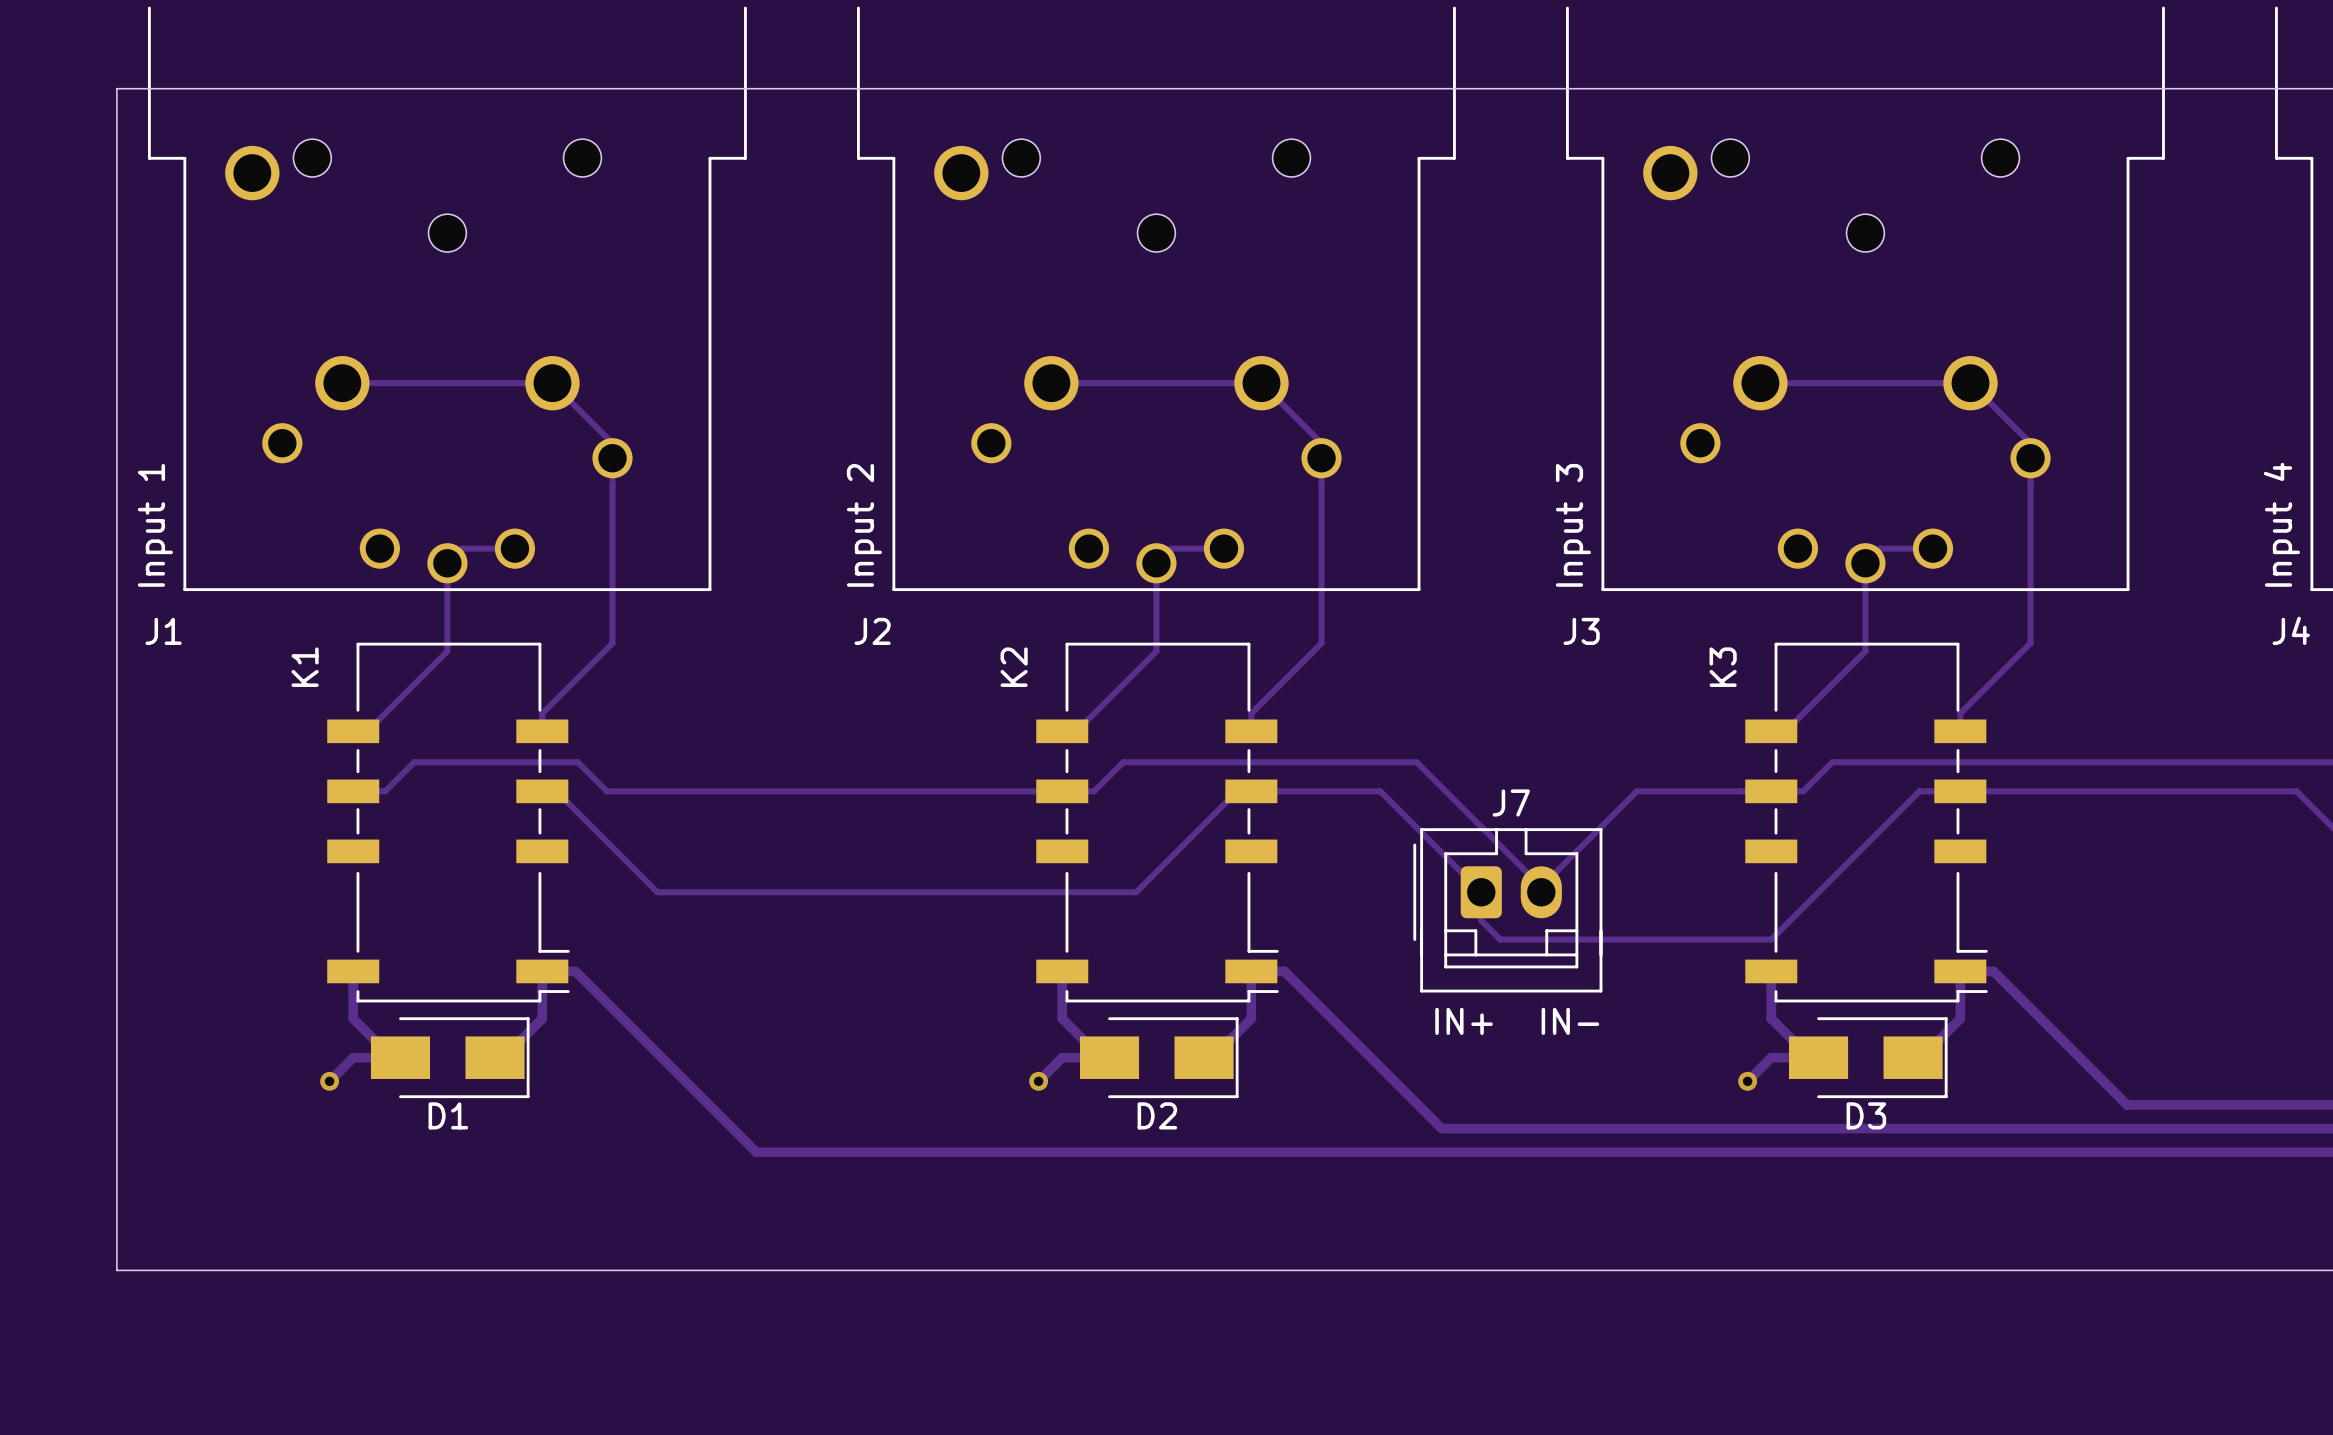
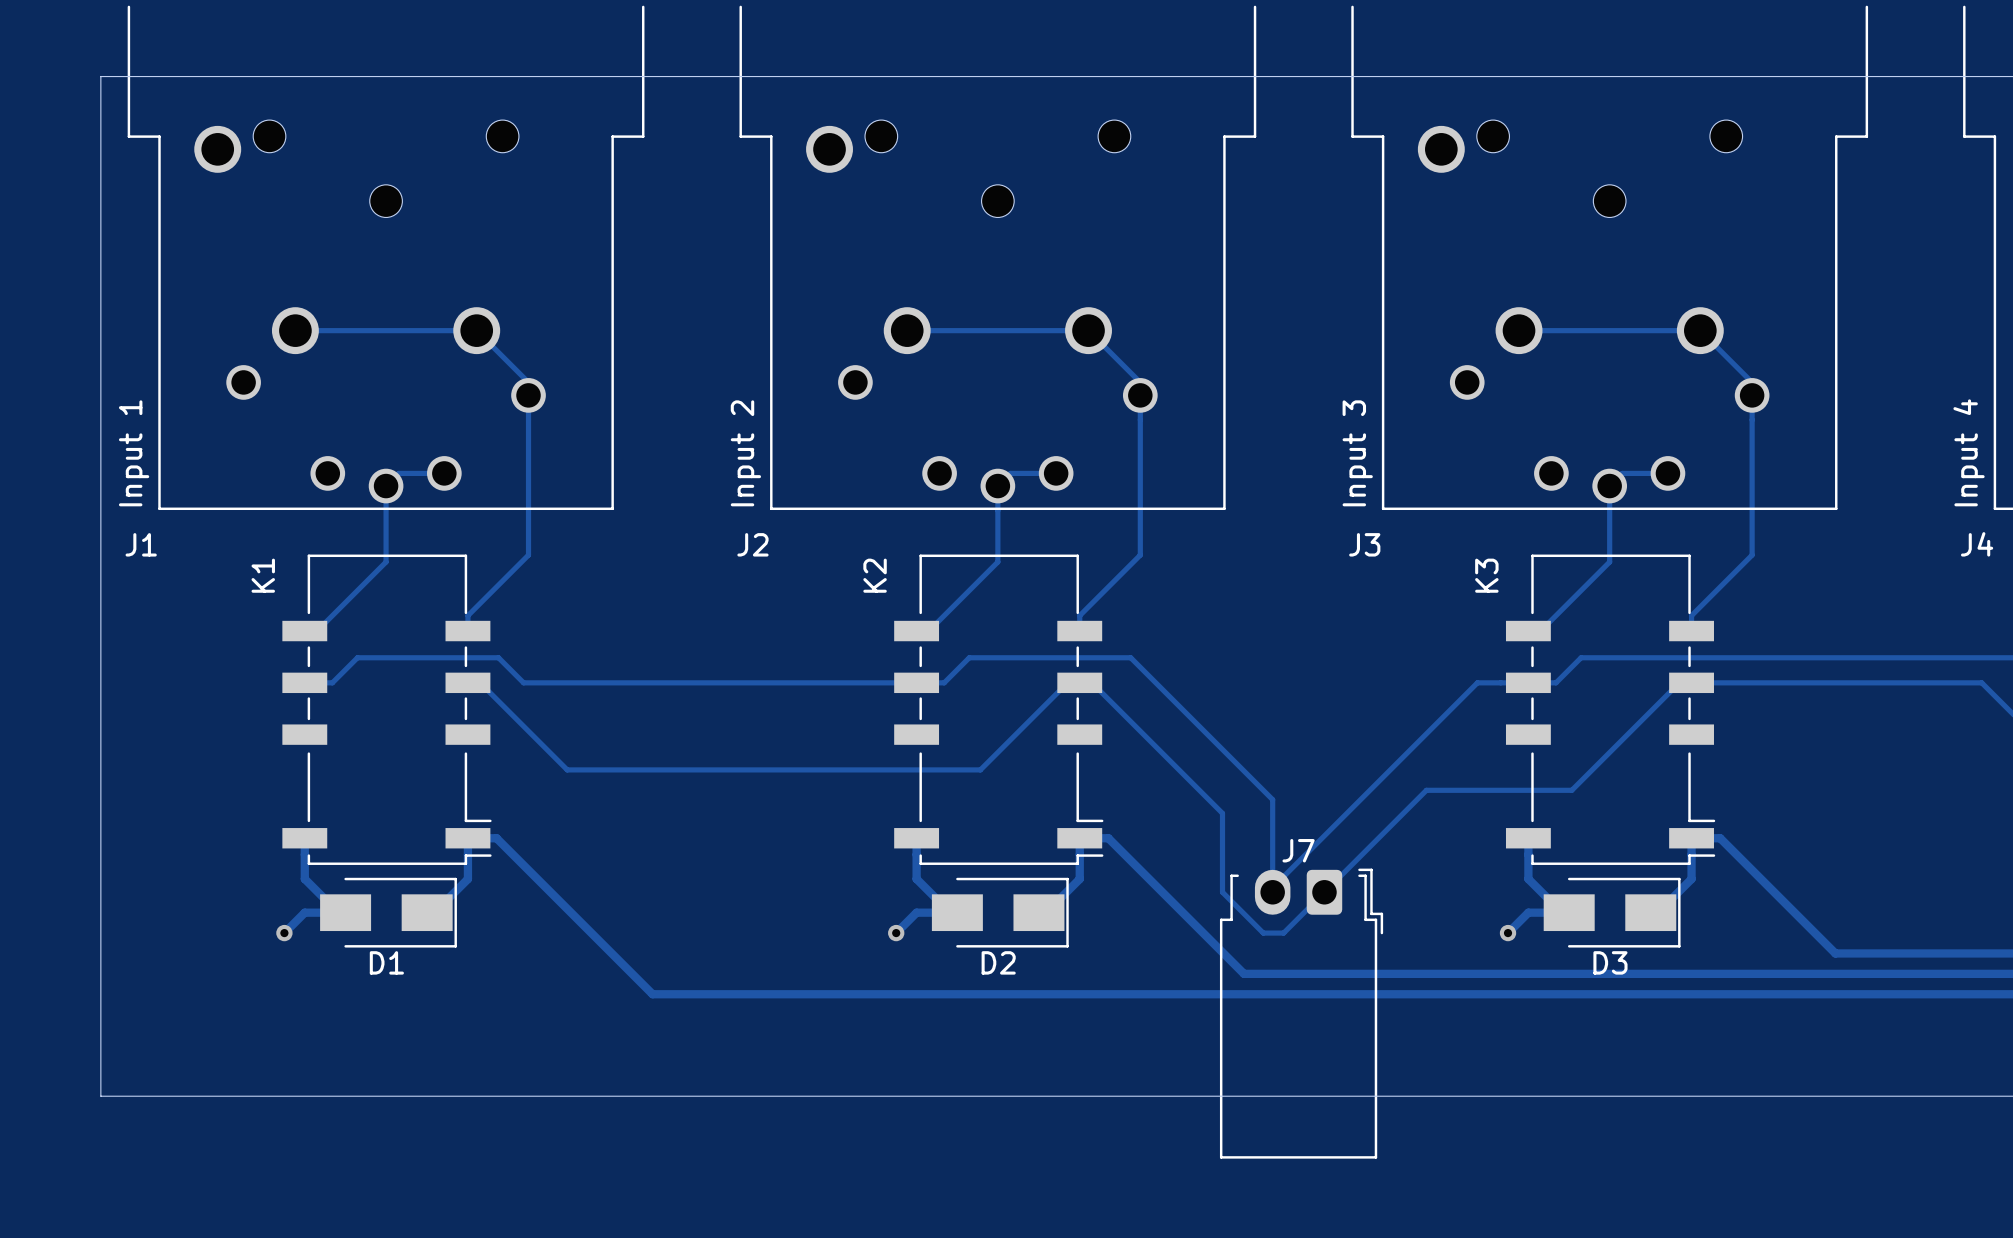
track: (1310, 762) (1416, 762) (1541, 886) -> (1130, 657) (1272, 799) (1272, 892)
track: (1265, 791) (1380, 791) (1481, 892) (1481, 920) (1500, 939) (1771, 939) (1919, 791) (1946, 791) -> (1091, 682) (1222, 813) (1222, 892) (1263, 933) (1283, 933) (1426, 790) (1571, 790) (1679, 682)
track: (1712, 791) (1636, 791) (1541, 886) -> (1477, 682) (1272, 887)
J7 name position: J7 (1511, 802) -> J7 (1298, 850)
J7 footprint: [1413, 828, 1603, 993] -> [1219, 868, 1384, 1159]

